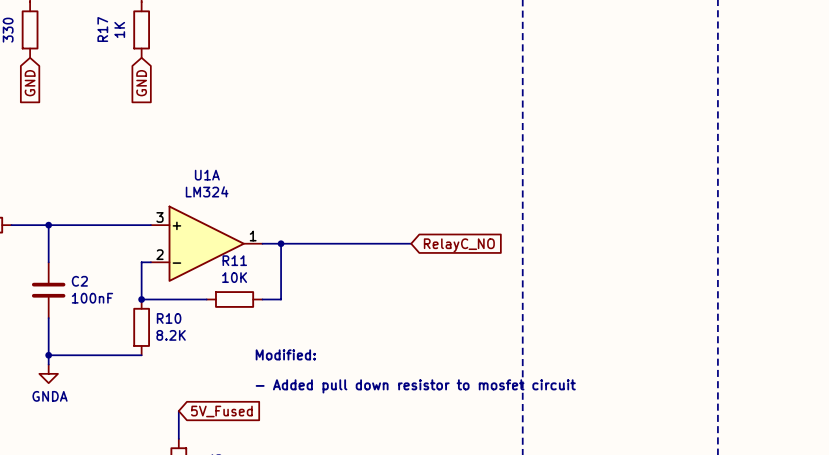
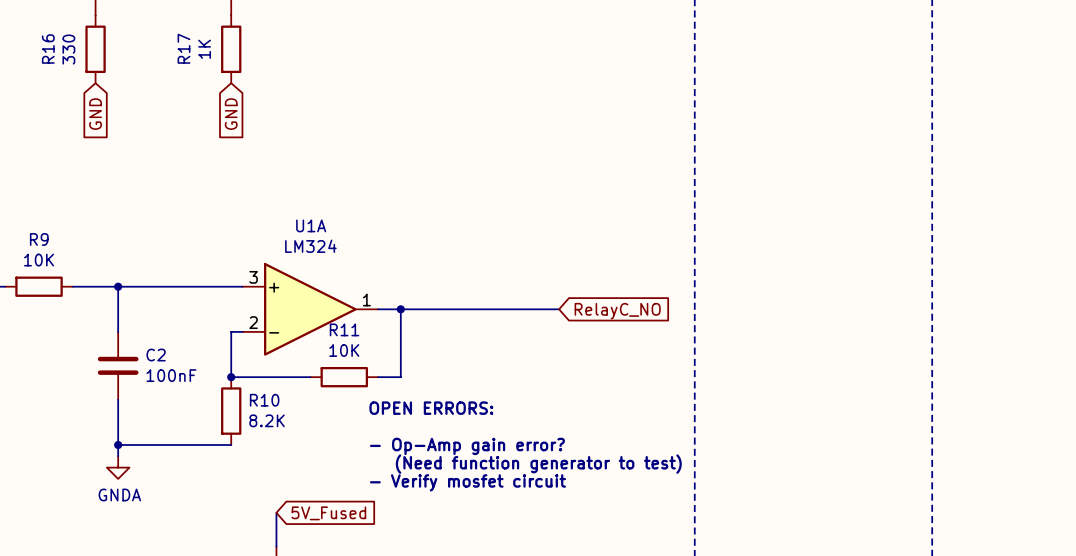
text: none -> OPEN ERRORS: (431, 408)
text: Modified: (285, 354) -> - Op-Amp gain error? (467, 446)
text: none -> (Need function generator to test) (538, 464)
text: - Added pull down resistor to mosfet circuit (415, 386) -> - Verify mosfet circuit (467, 482)

